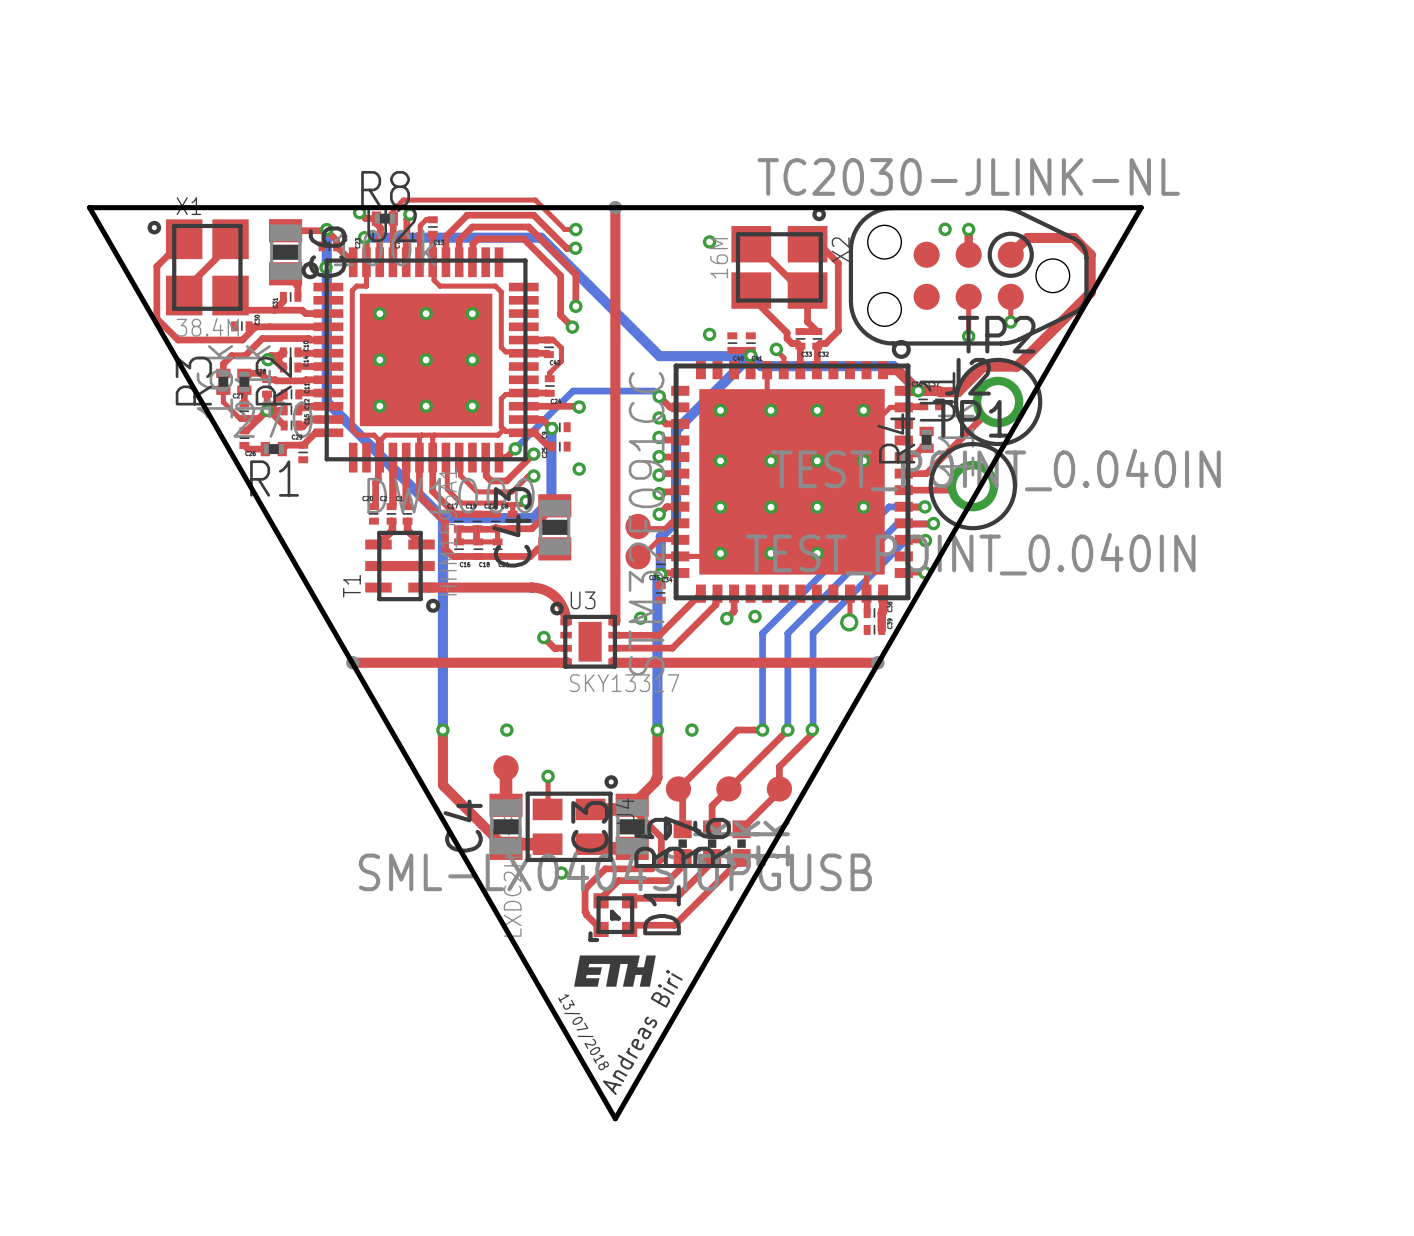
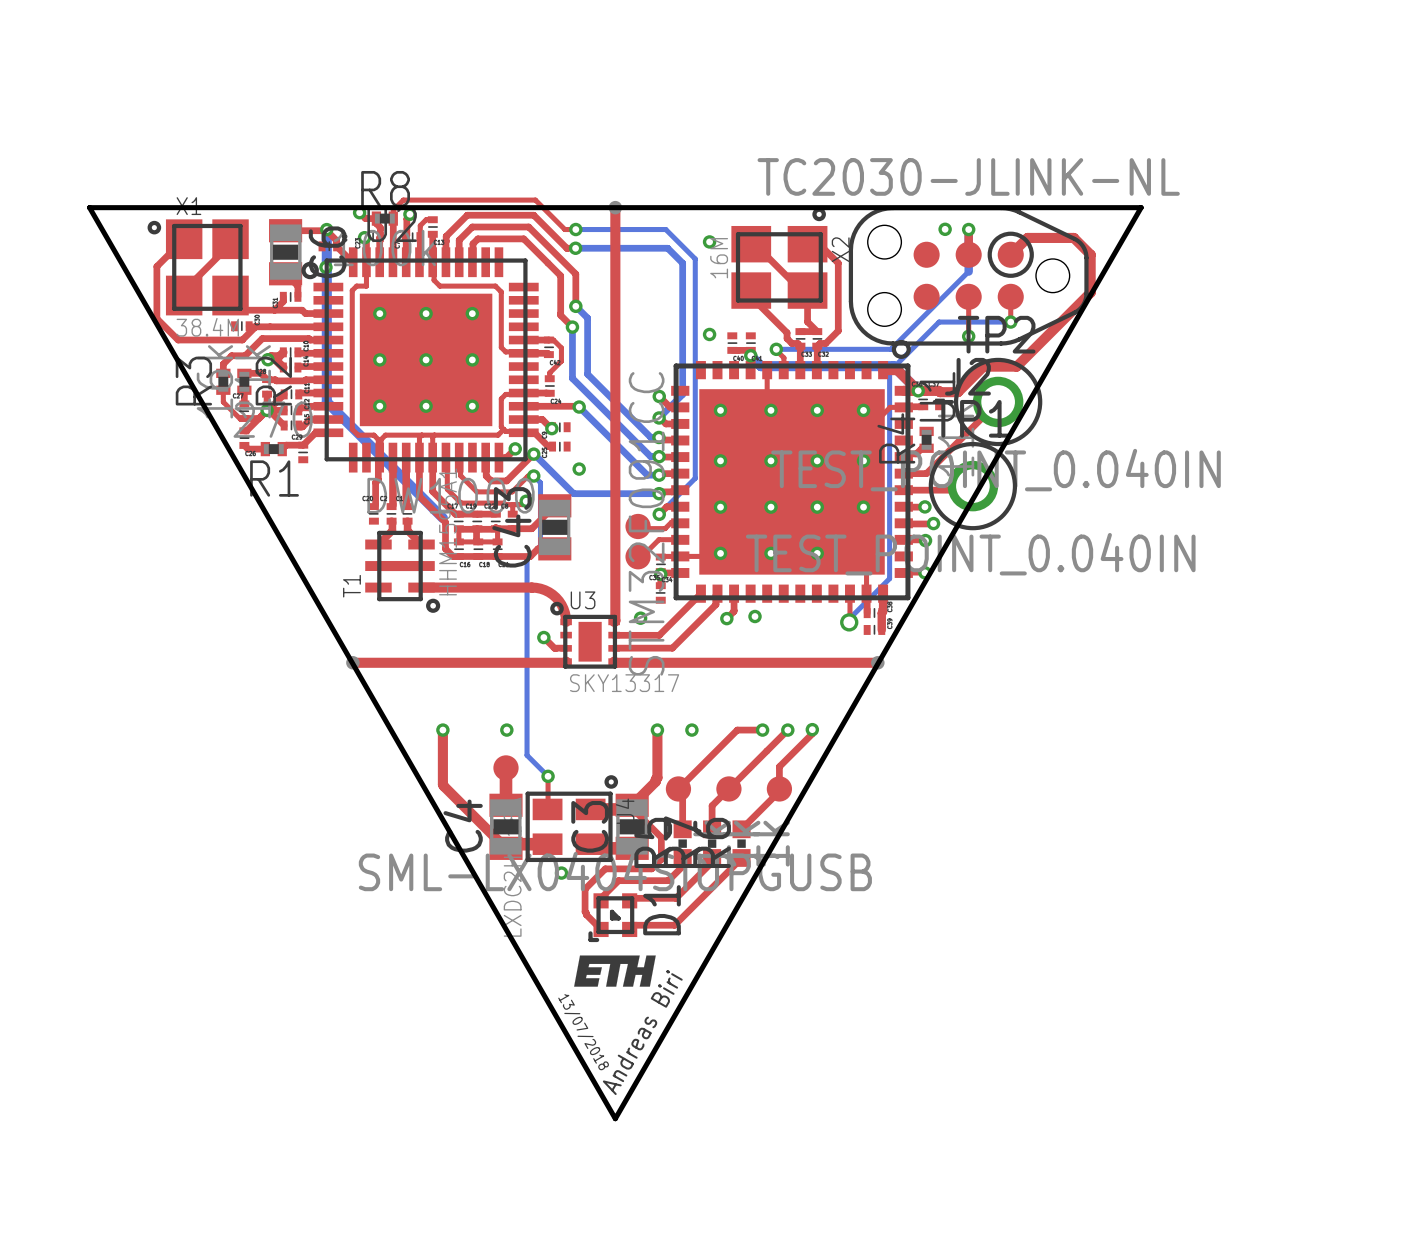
bottom track: none -> (575, 229) (665, 229) (695, 258) (695, 478) (659, 514)
bottom track: none -> (968, 229) (968, 271) (890, 349) (776, 349)
bottom track: (364, 237) (541, 237) (659, 356) (750, 356) -> none
bottom track: none -> (575, 248) (667, 248) (682, 263) (682, 394) (659, 417)
bottom track: none -> (575, 306) (587, 318) (587, 374) (650, 437) (658, 437)
bottom track: none -> (1010, 322) (939, 322) (889, 371) (889, 578) (850, 618)
bottom track: none -> (572, 327) (572, 378) (650, 456) (659, 456)
bottom track: (750, 355) (676, 430) (676, 521) (660, 536) (660, 574) (657, 577) (657, 730) -> none
bottom track: (659, 396) (653, 391) (573, 391) (515, 448) -> none
bottom track: none -> (579, 407) (647, 475) (659, 475)
bottom track: (551, 429) (551, 499) (533, 518) (442, 518) (442, 730) -> none
bottom track: none -> (534, 454) (573, 493) (659, 493)
bottom track: none -> (533, 476) (540, 482) (540, 545) (527, 559) (527, 755) (548, 776)
bottom track: (924, 506) (888, 506) (762, 633) (762, 730) -> none
bottom track: (933, 523) (897, 523) (787, 633) (787, 730) -> none
bottom track: (925, 540) (906, 539) (813, 633) (812, 729) -> none

